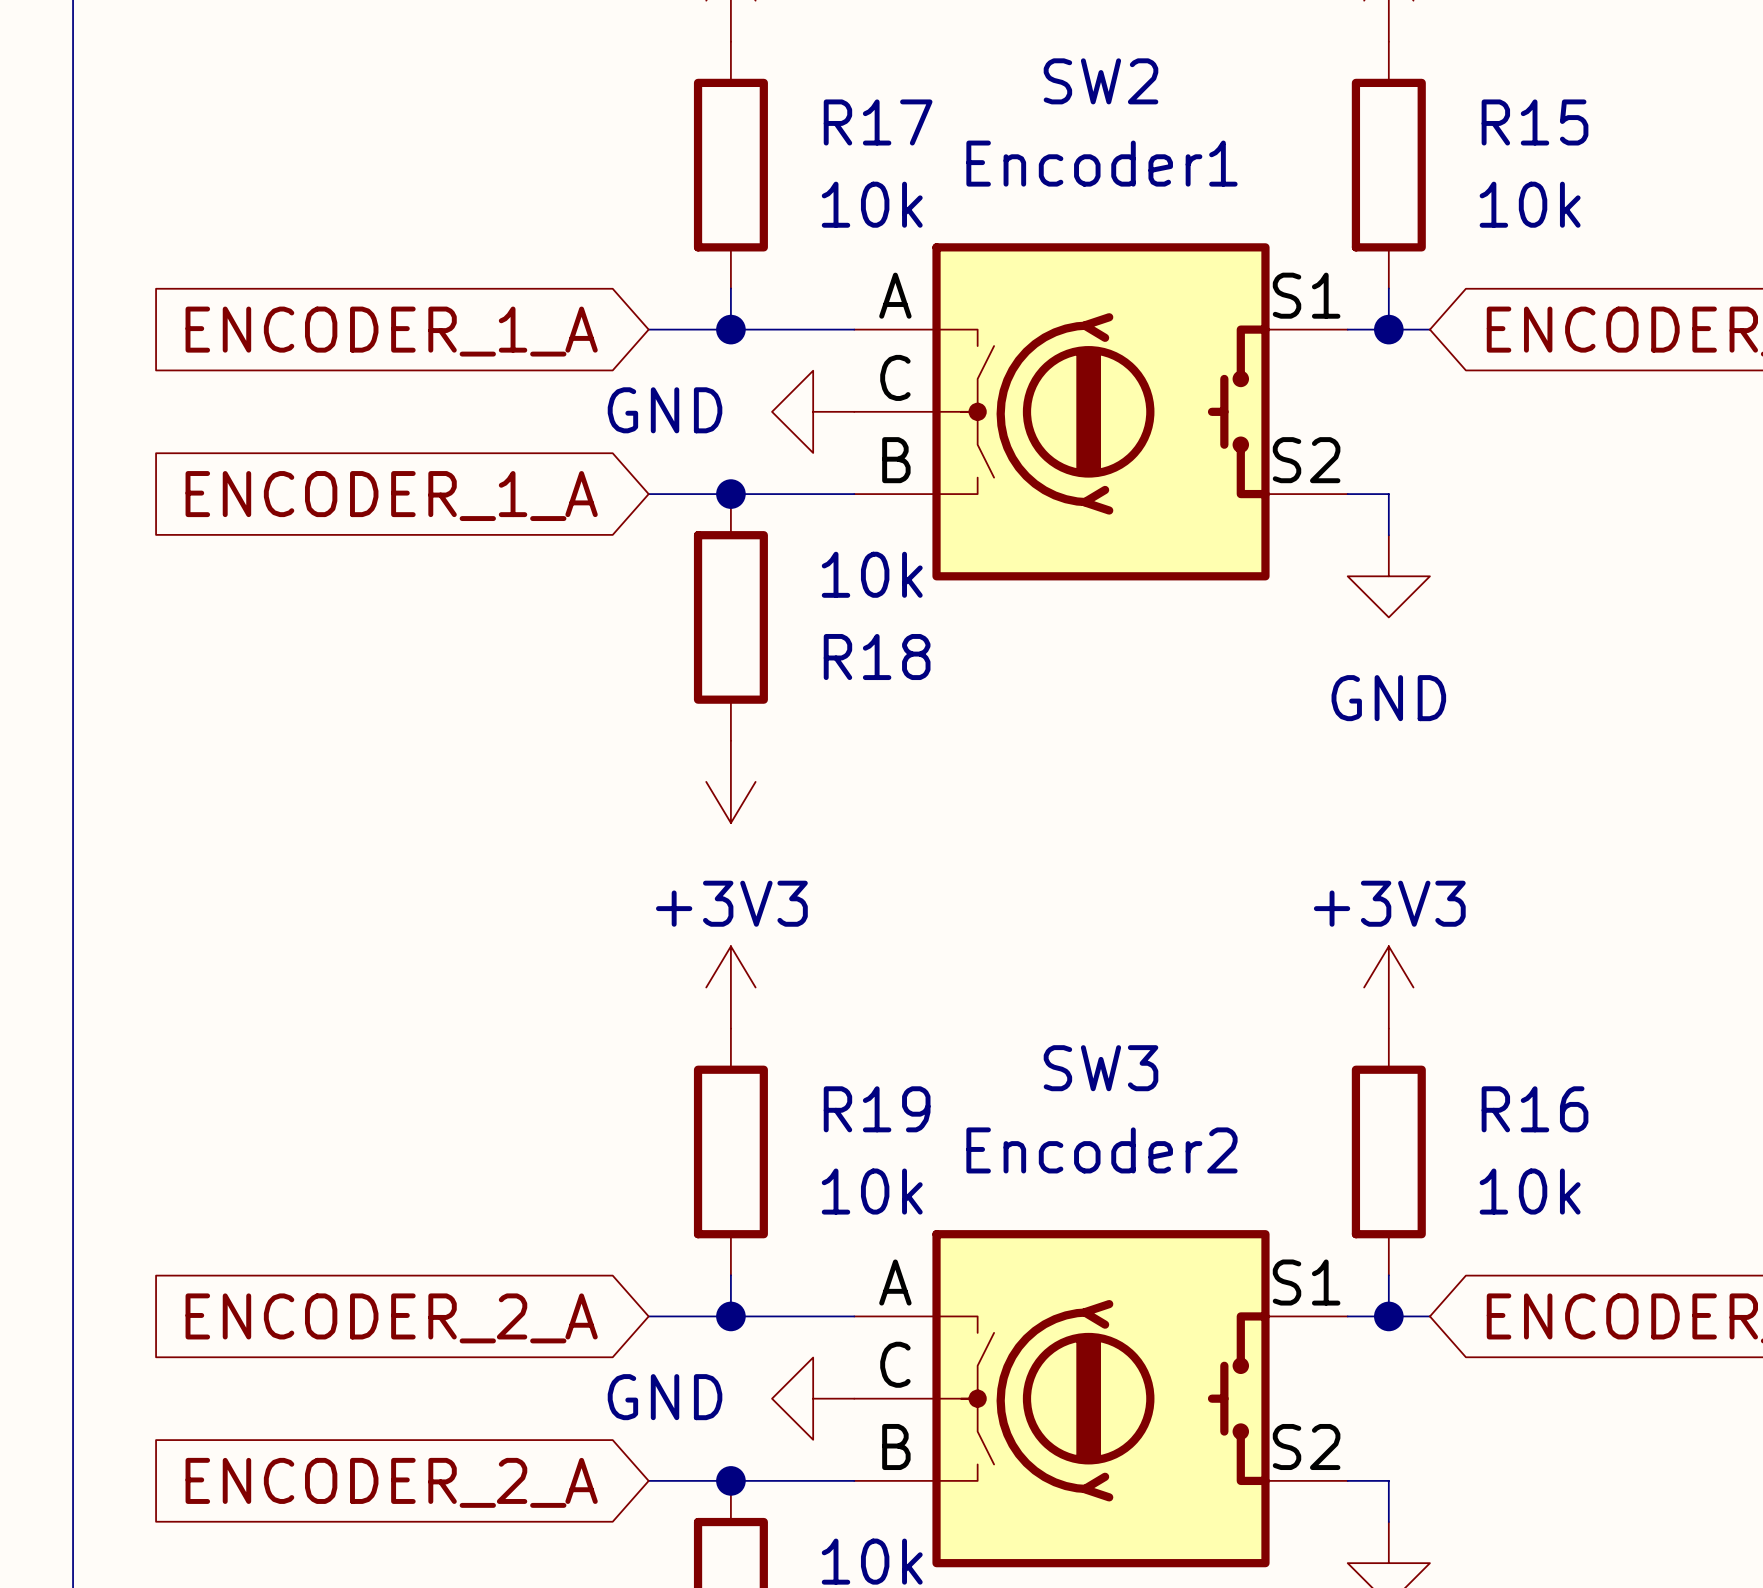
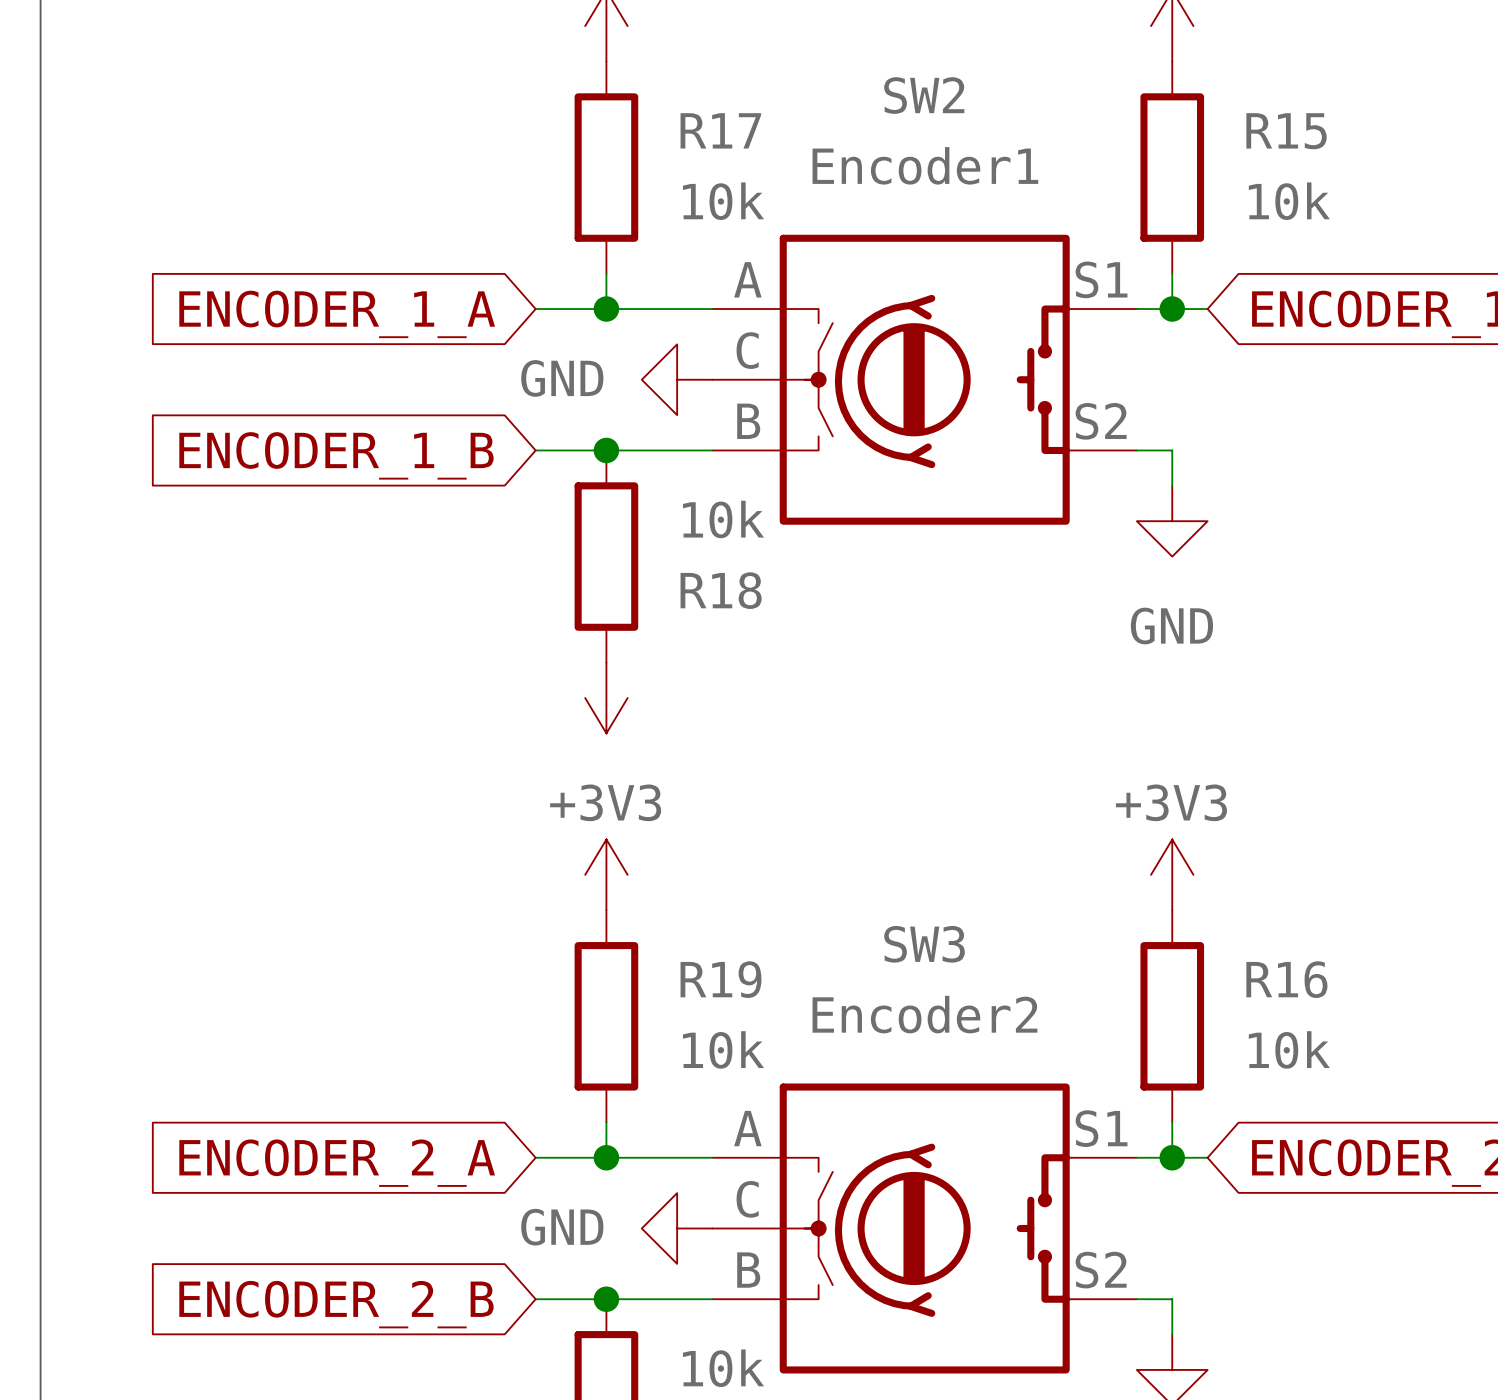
global label: ENCODER_1_A (391, 496) -> ENCODER_1_B (336, 455)
global label: ENCODER_2_A (391, 1482) -> ENCODER_2_B (336, 1304)

